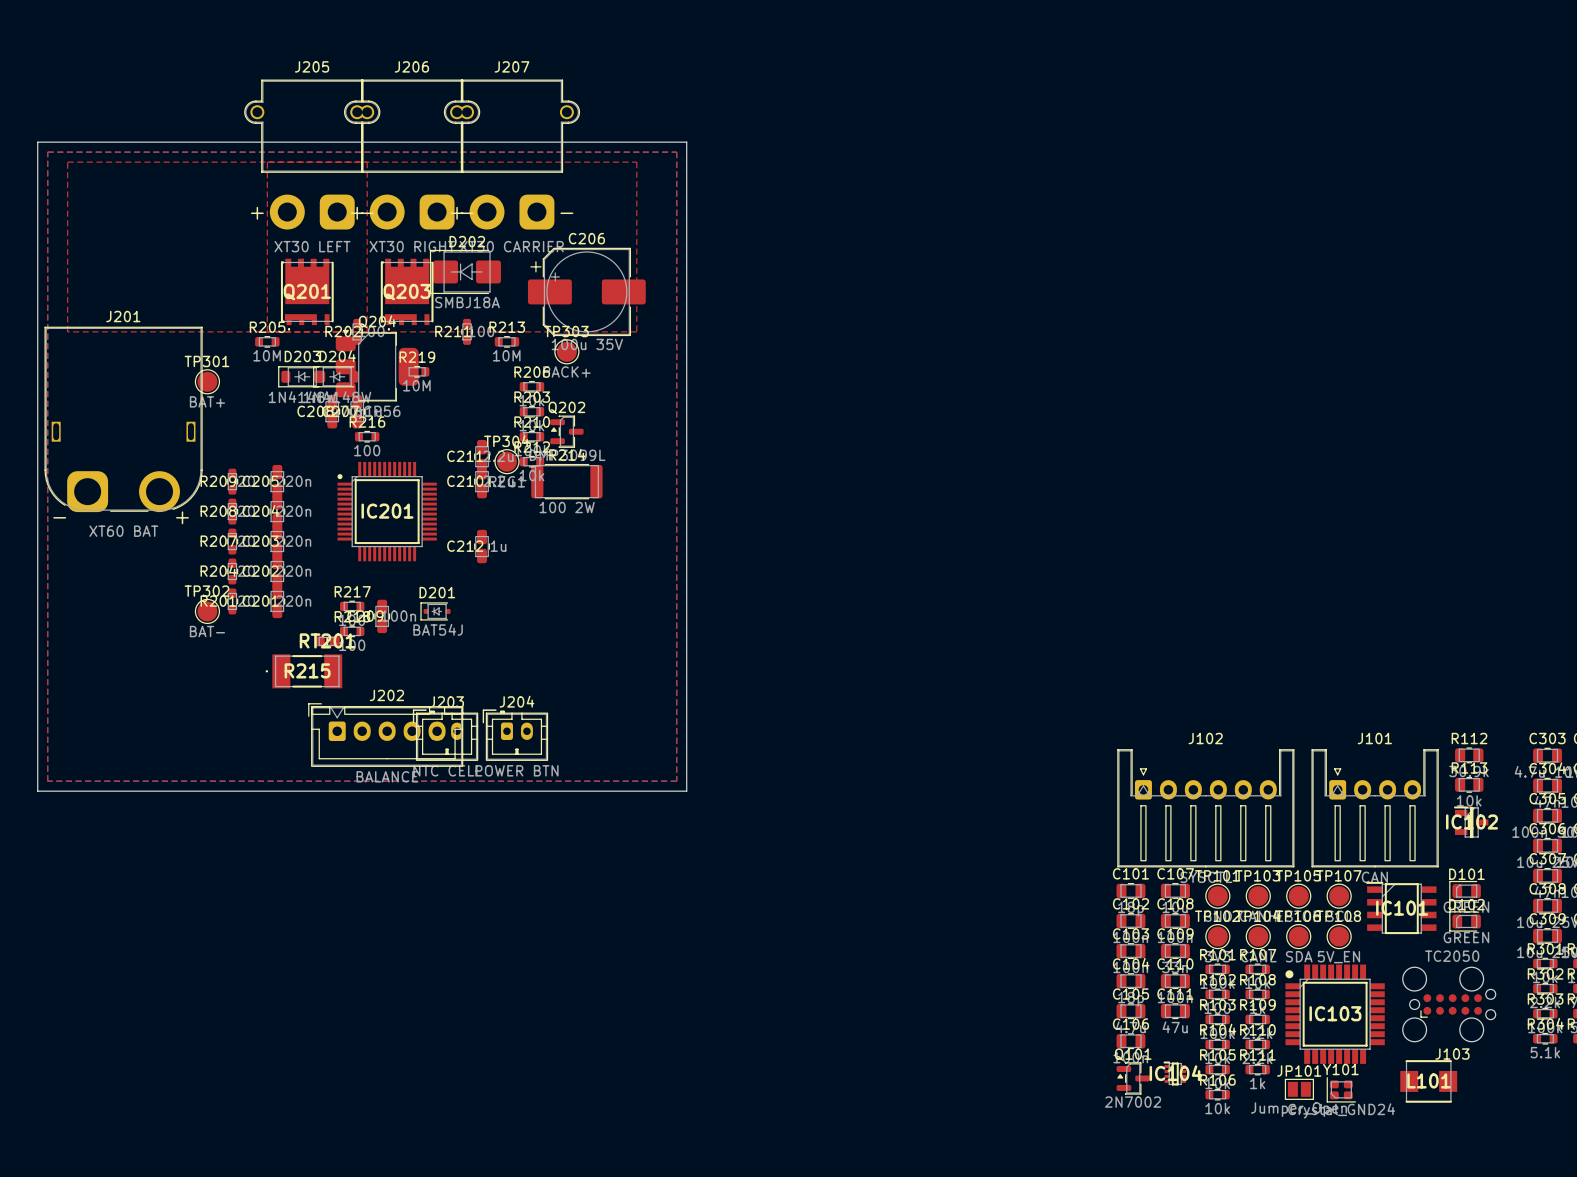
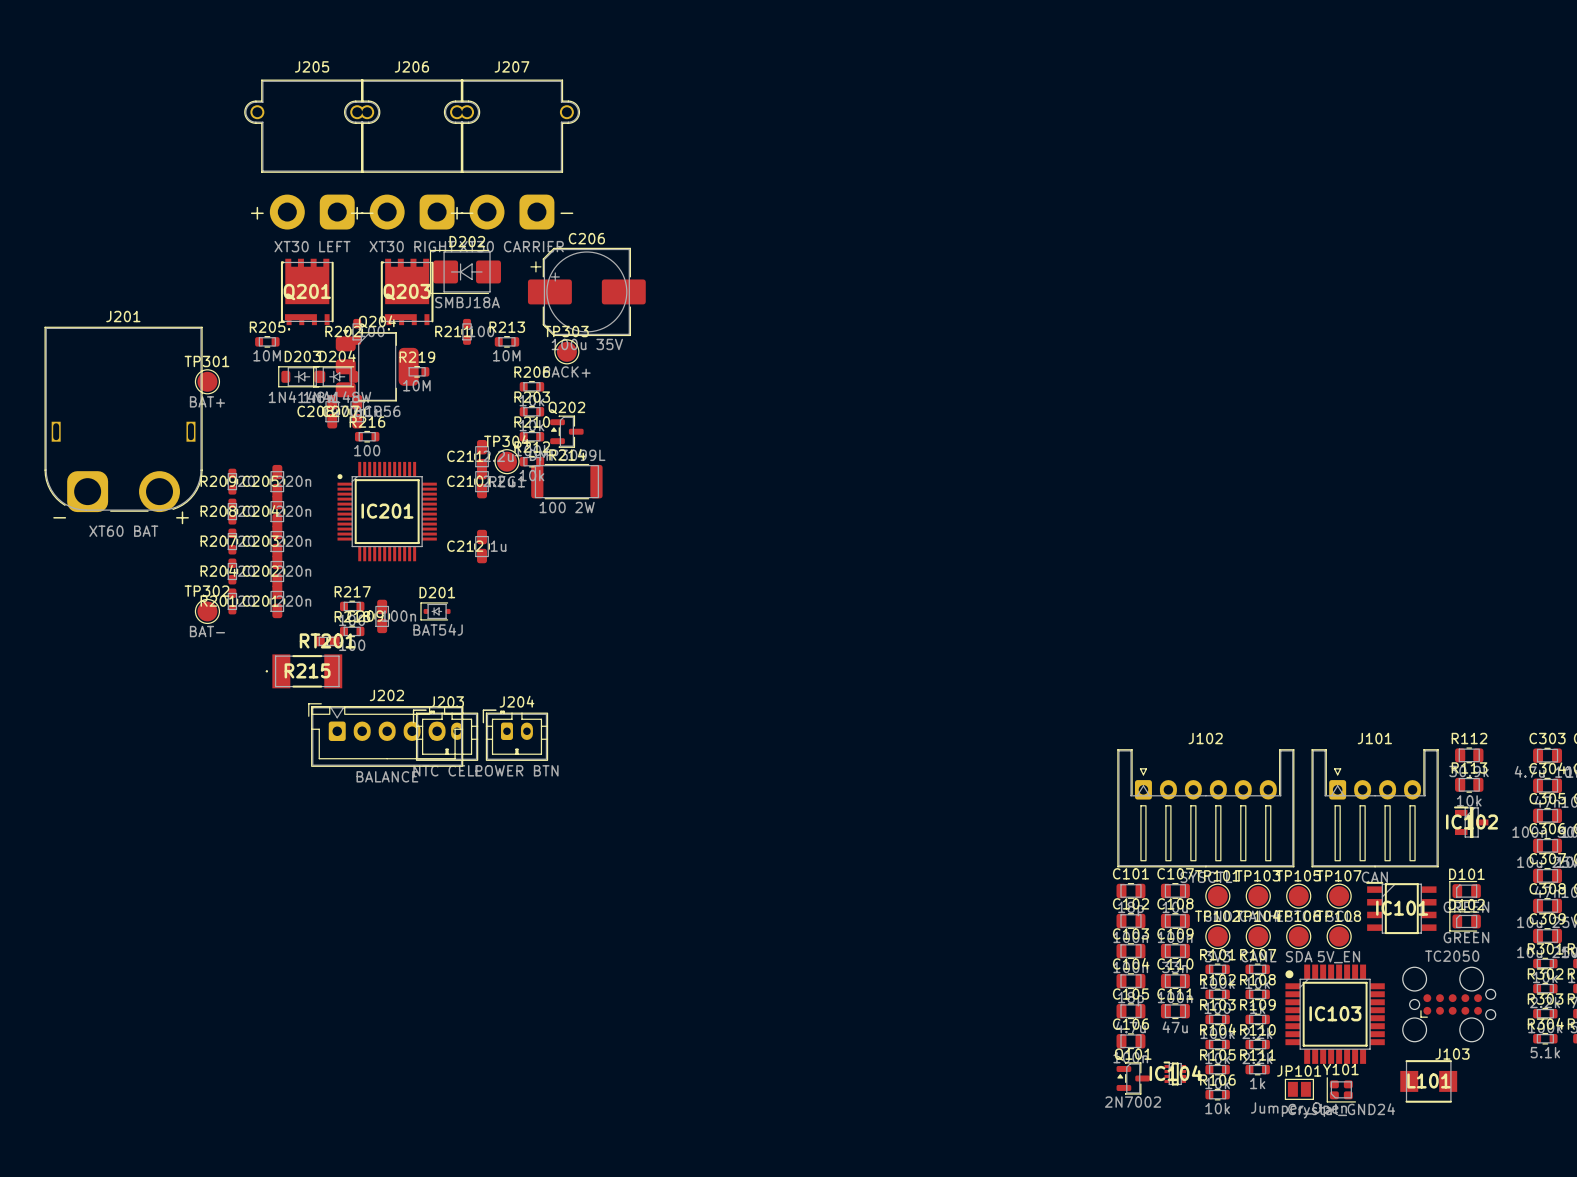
board edge: (37, 142) (686, 142) (686, 791) (37, 791) (37, 142) -> none
top zone outline: (47, 152) (676, 152) (676, 781) (47, 781) (47, 152) -> none
top zone outline: (67, 162) (636, 162) (636, 331) (67, 331) (67, 162) -> none
top zone outline: (267, 162) (267, 331) -> none
top zone outline: (367, 162) (367, 331) -> none

